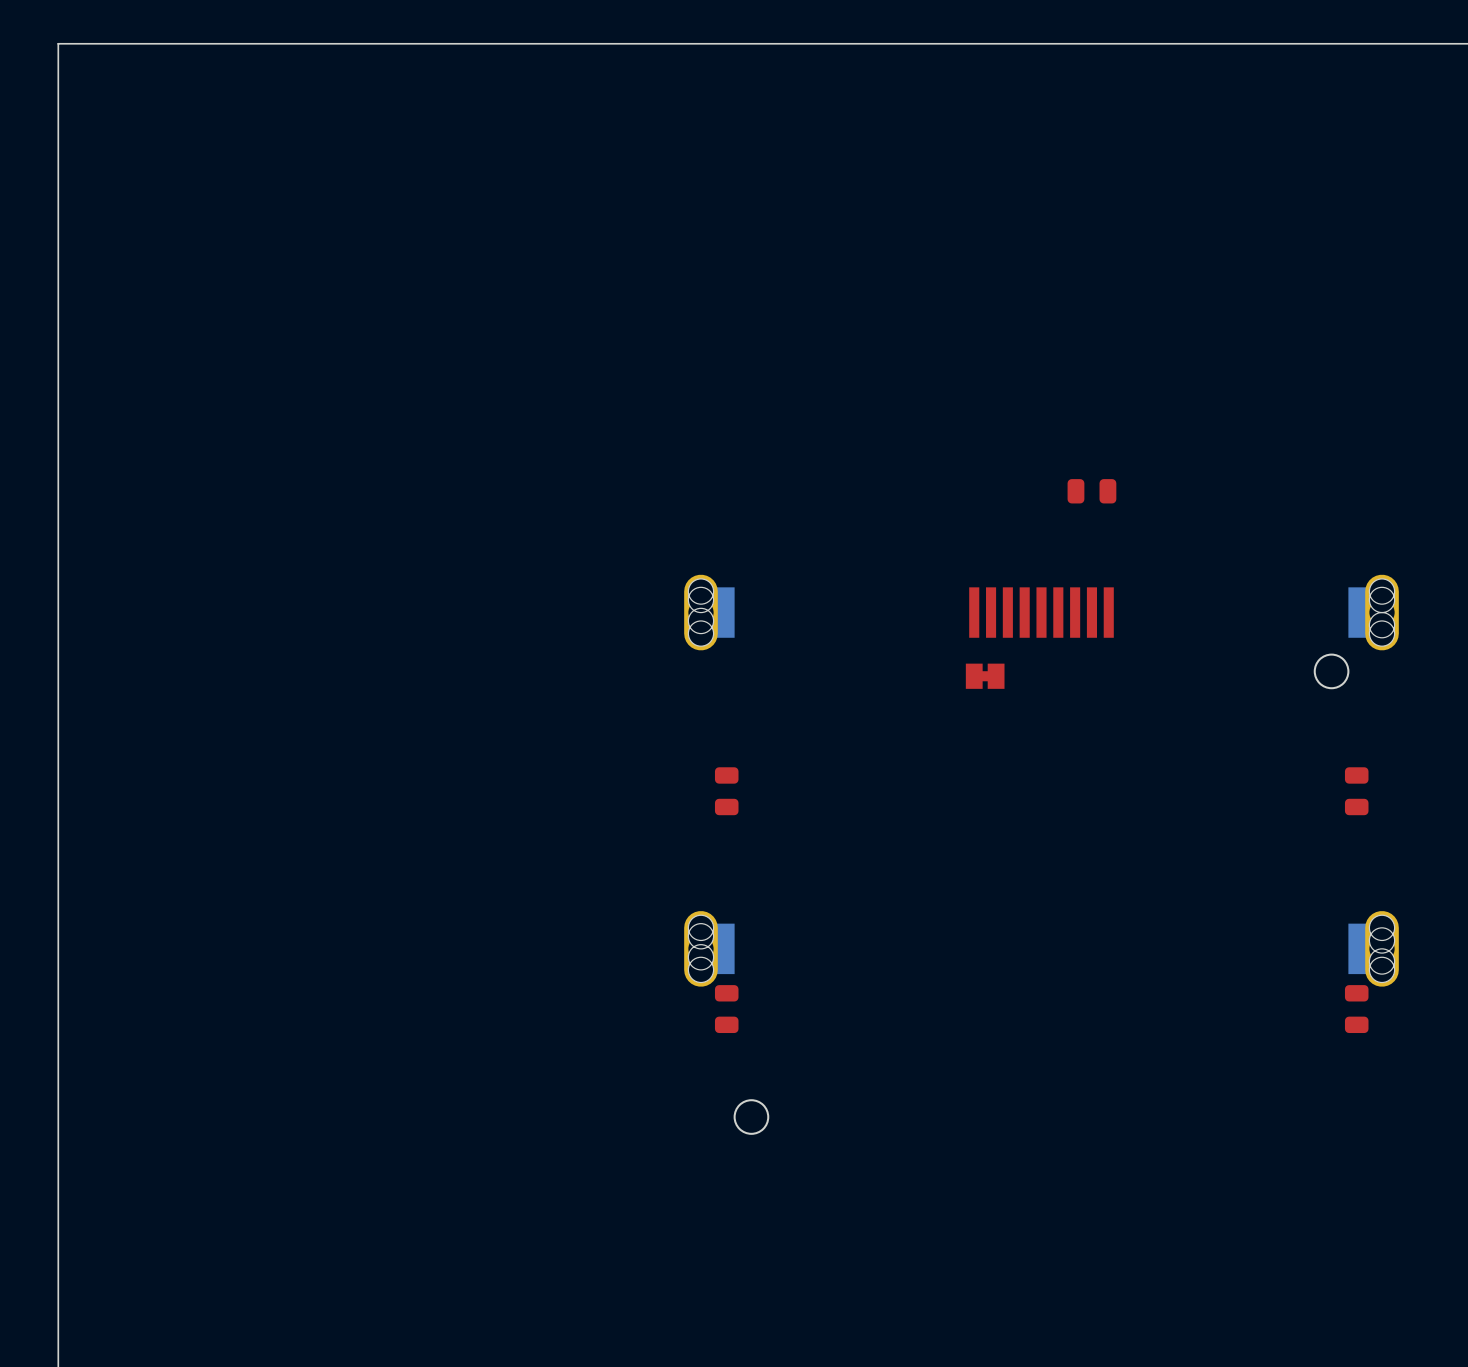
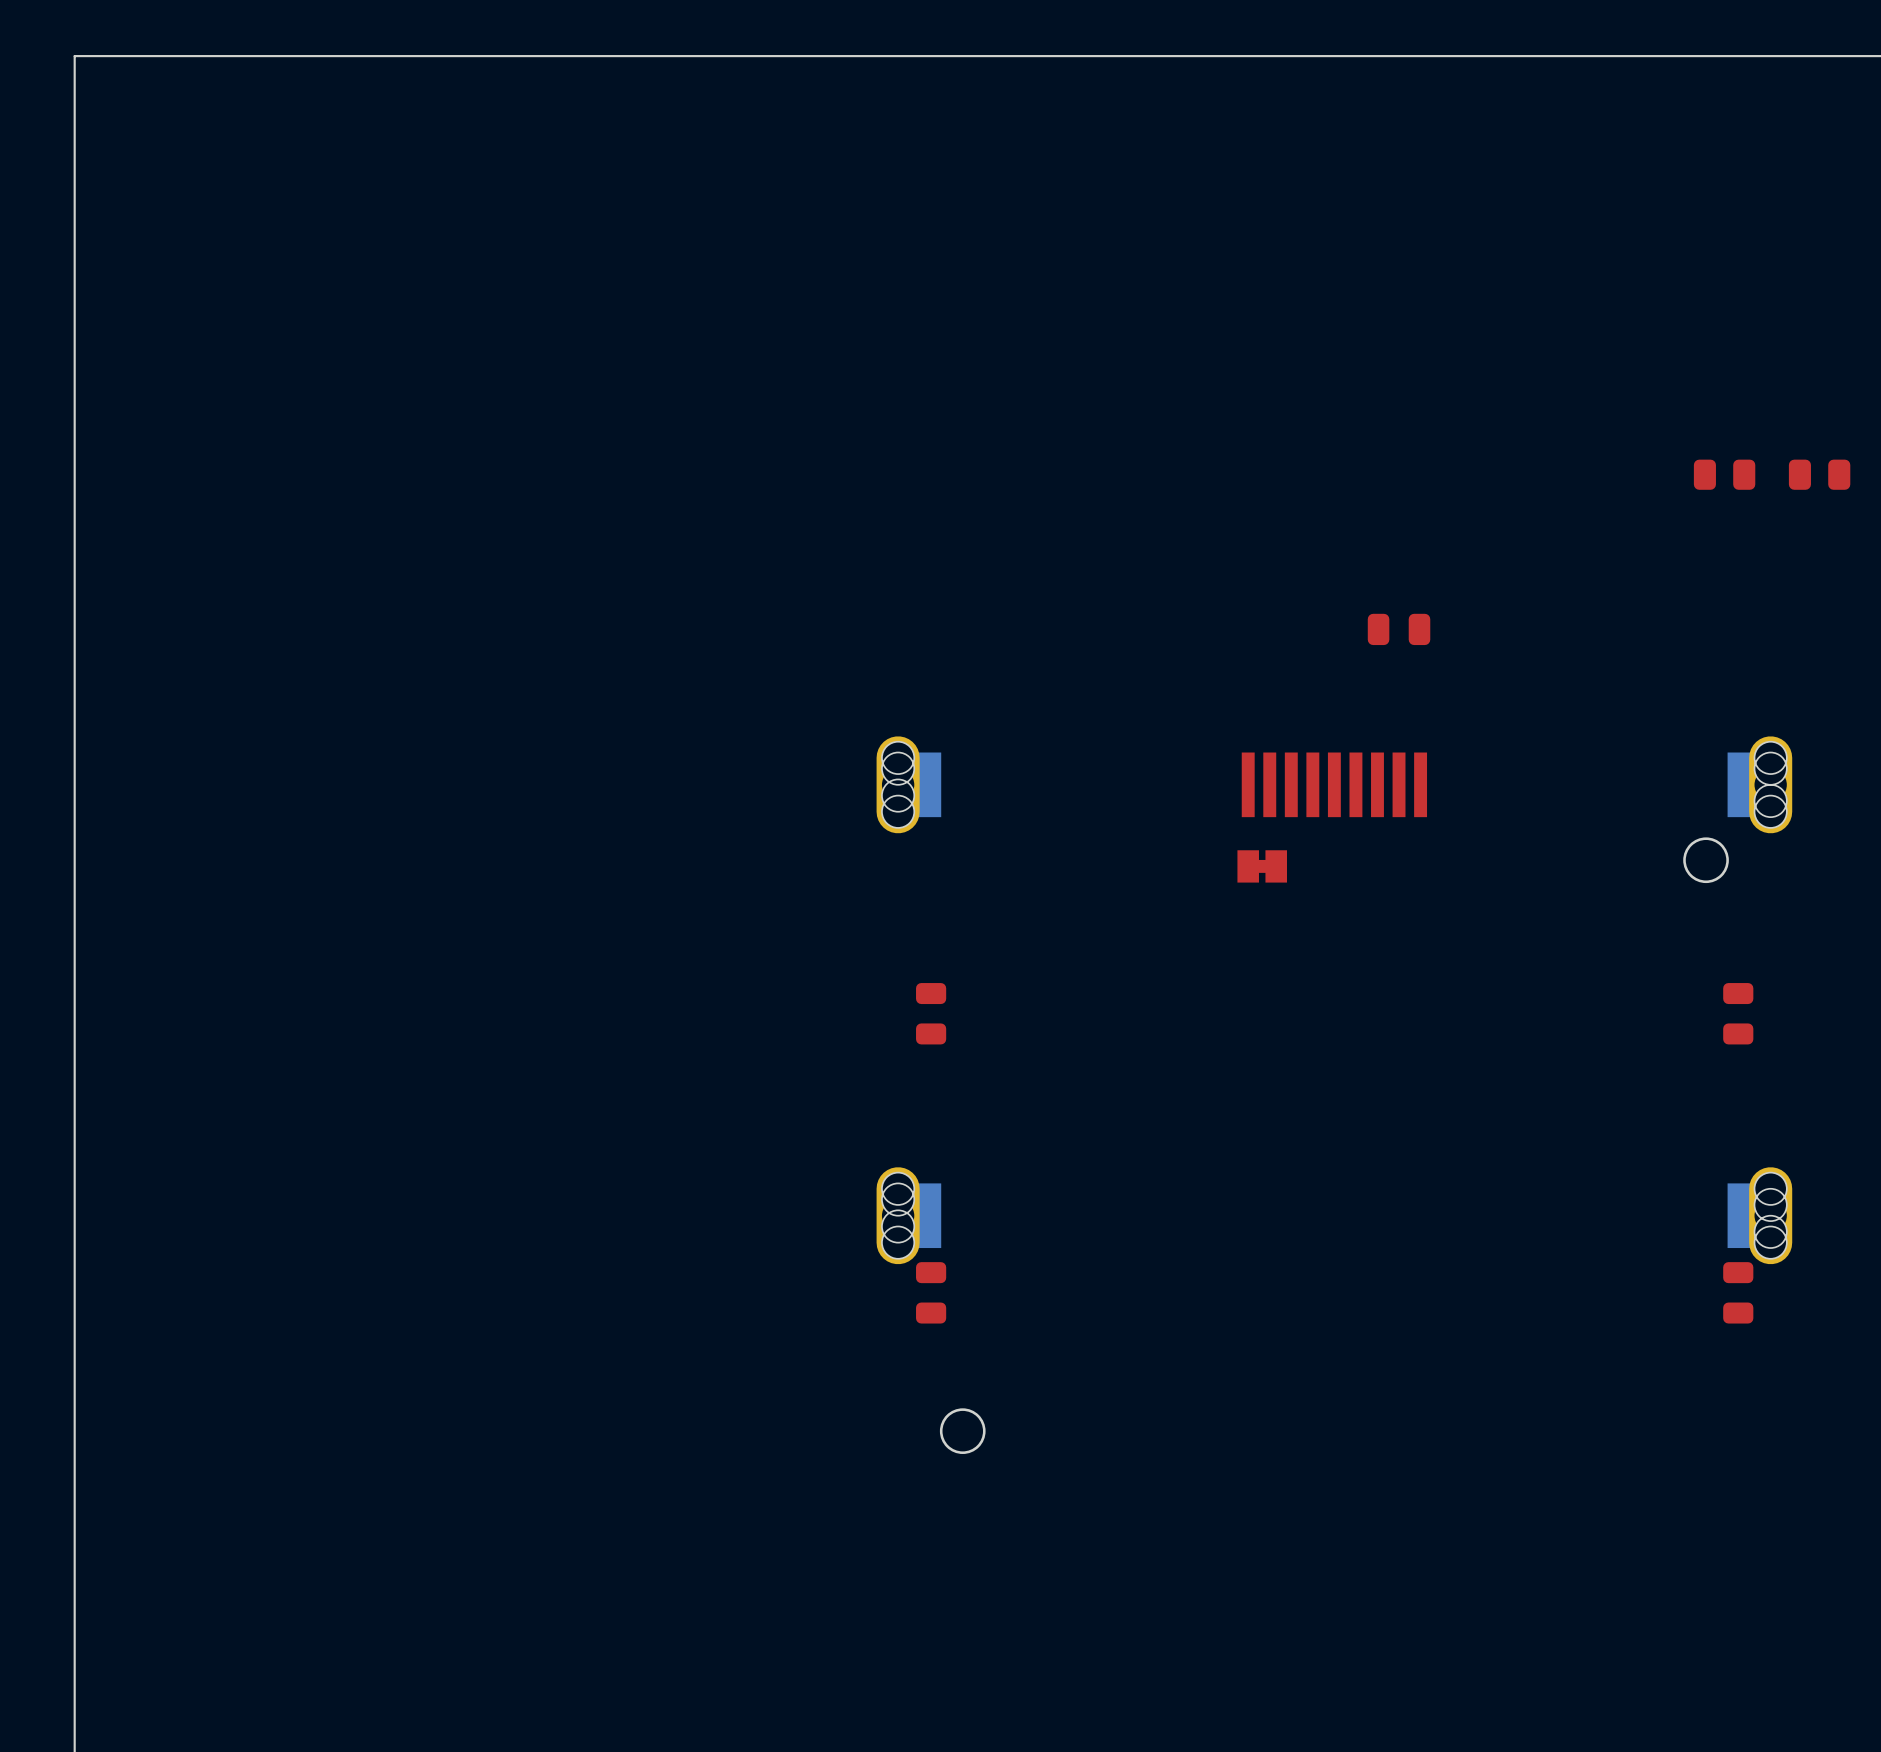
part: none -> (1724, 474)
part: none -> (1819, 474)

